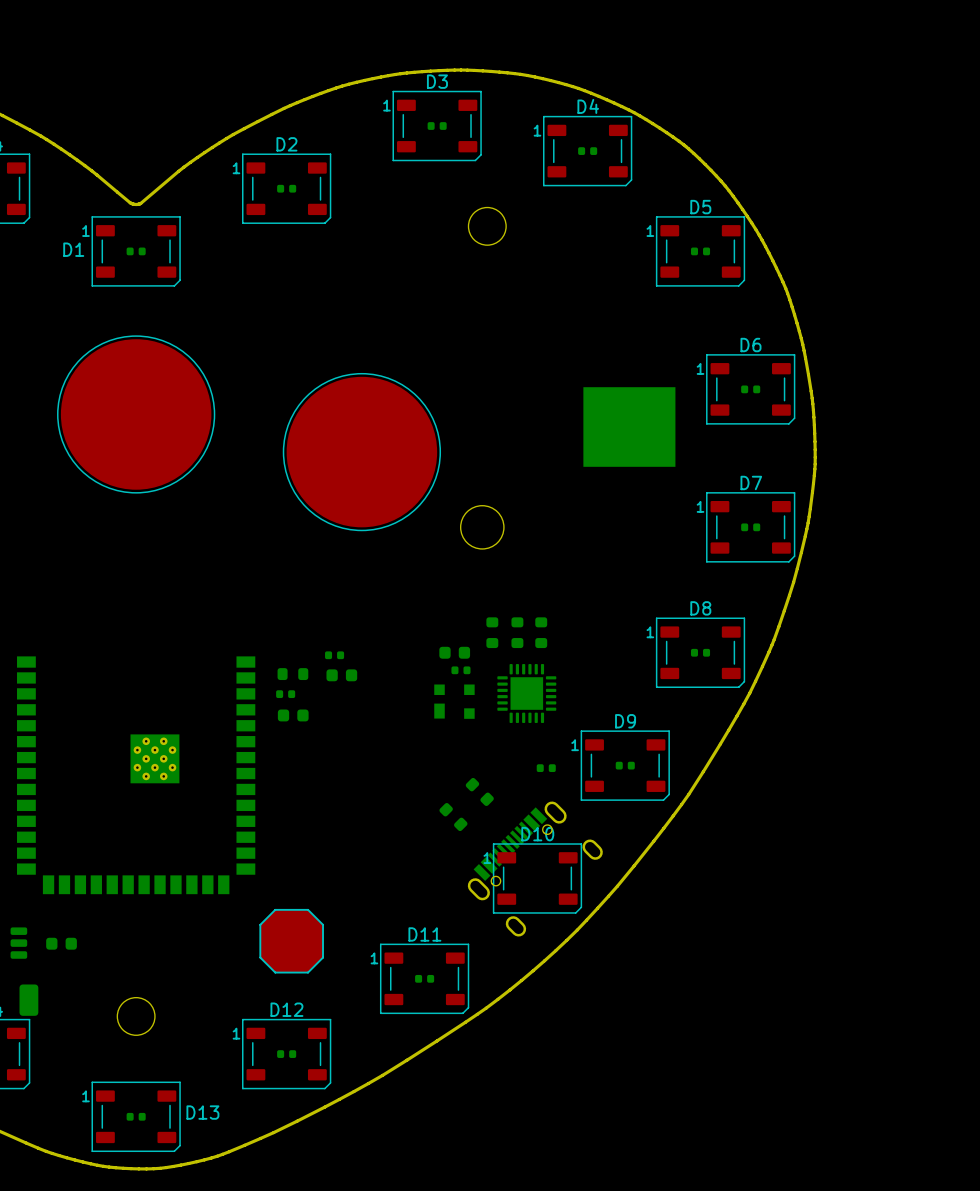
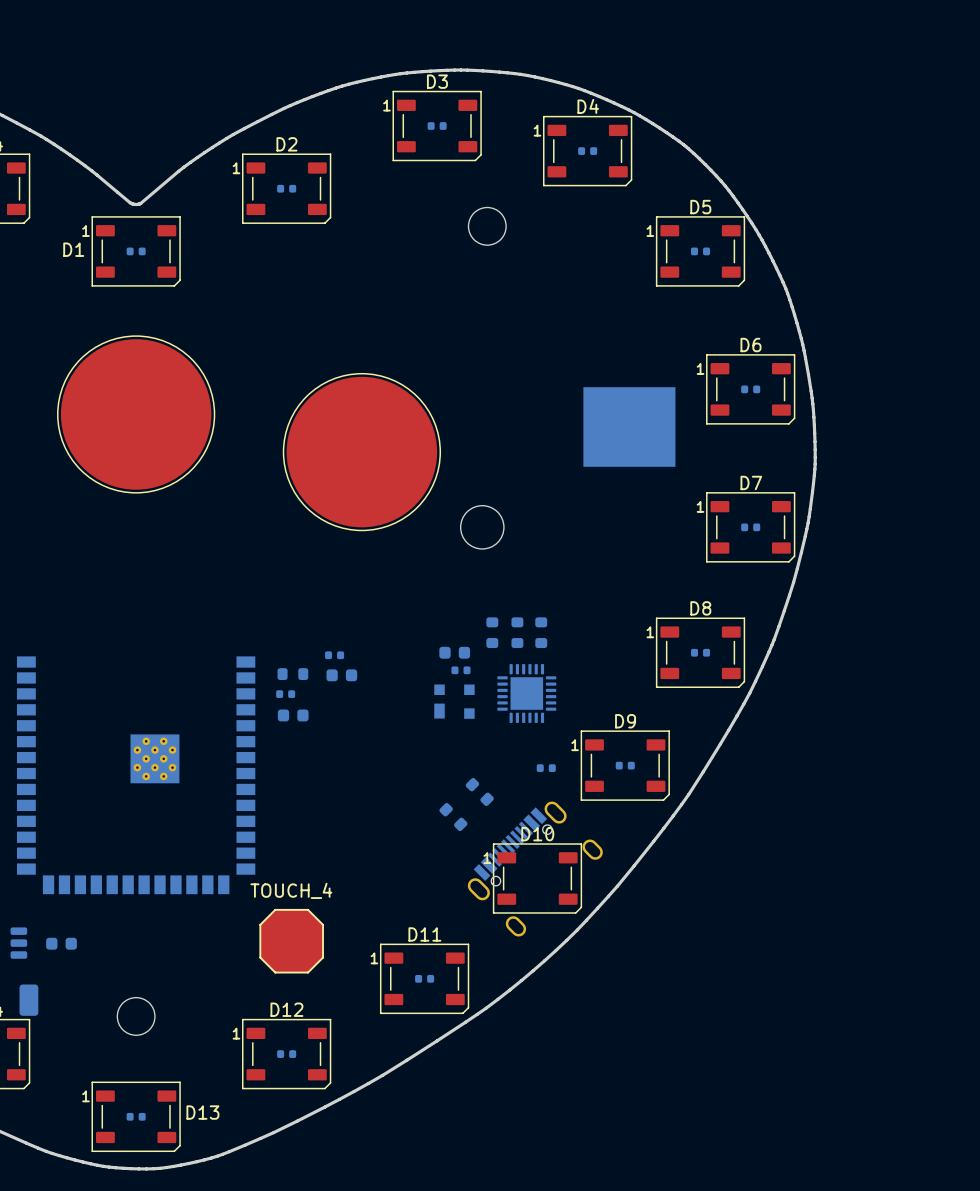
TOUCH_4 name: none -> TOUCH_4 (291, 890)

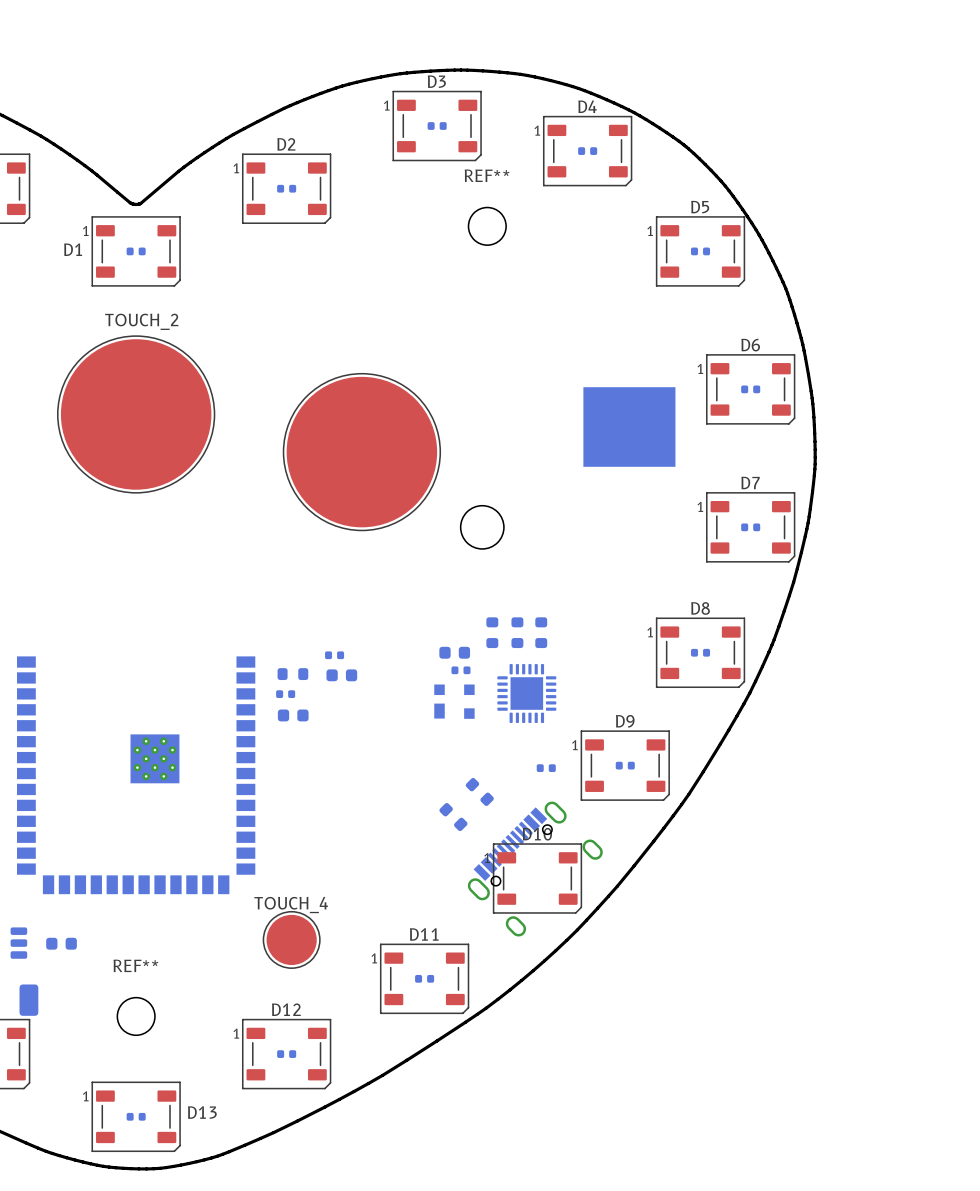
REF** name: none -> REF** (487, 175)
TOUCH_2 name: none -> TOUCH_2 (141, 321)
TOUCH_4 footprint: [259, 908, 324, 974] -> [262, 910, 321, 969]
REF** name: none -> REF** (135, 965)

